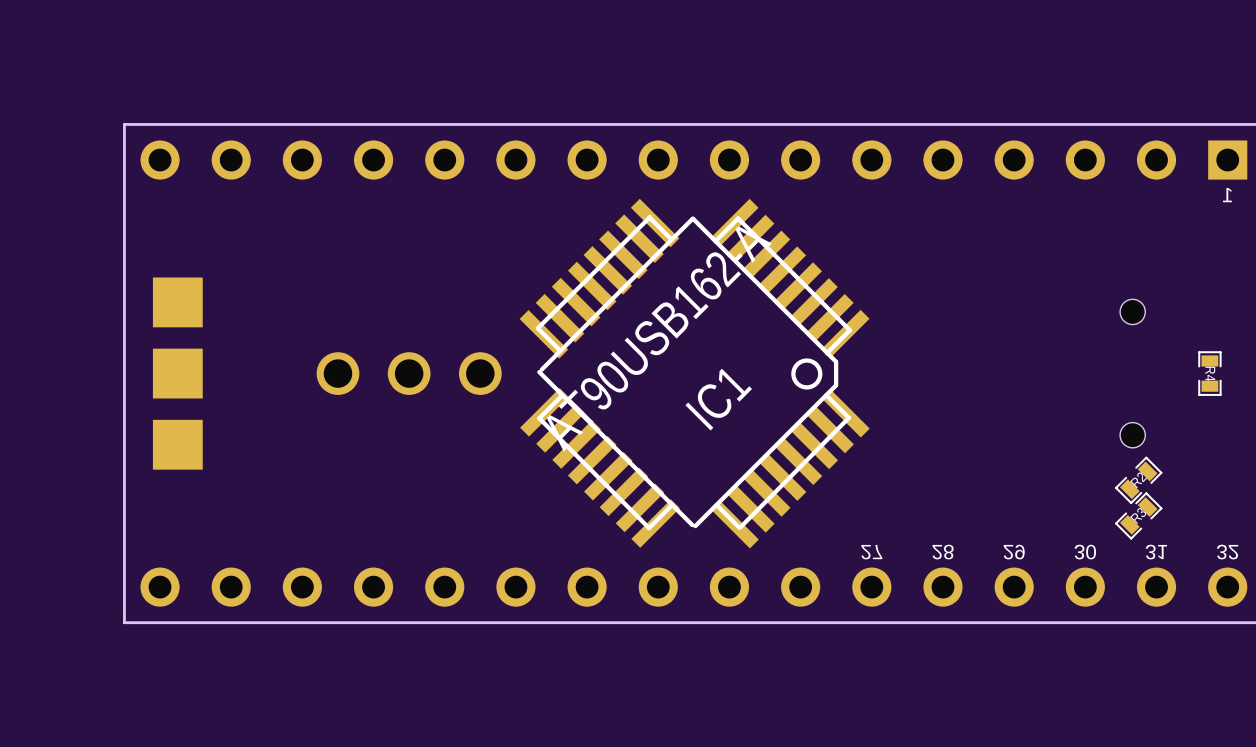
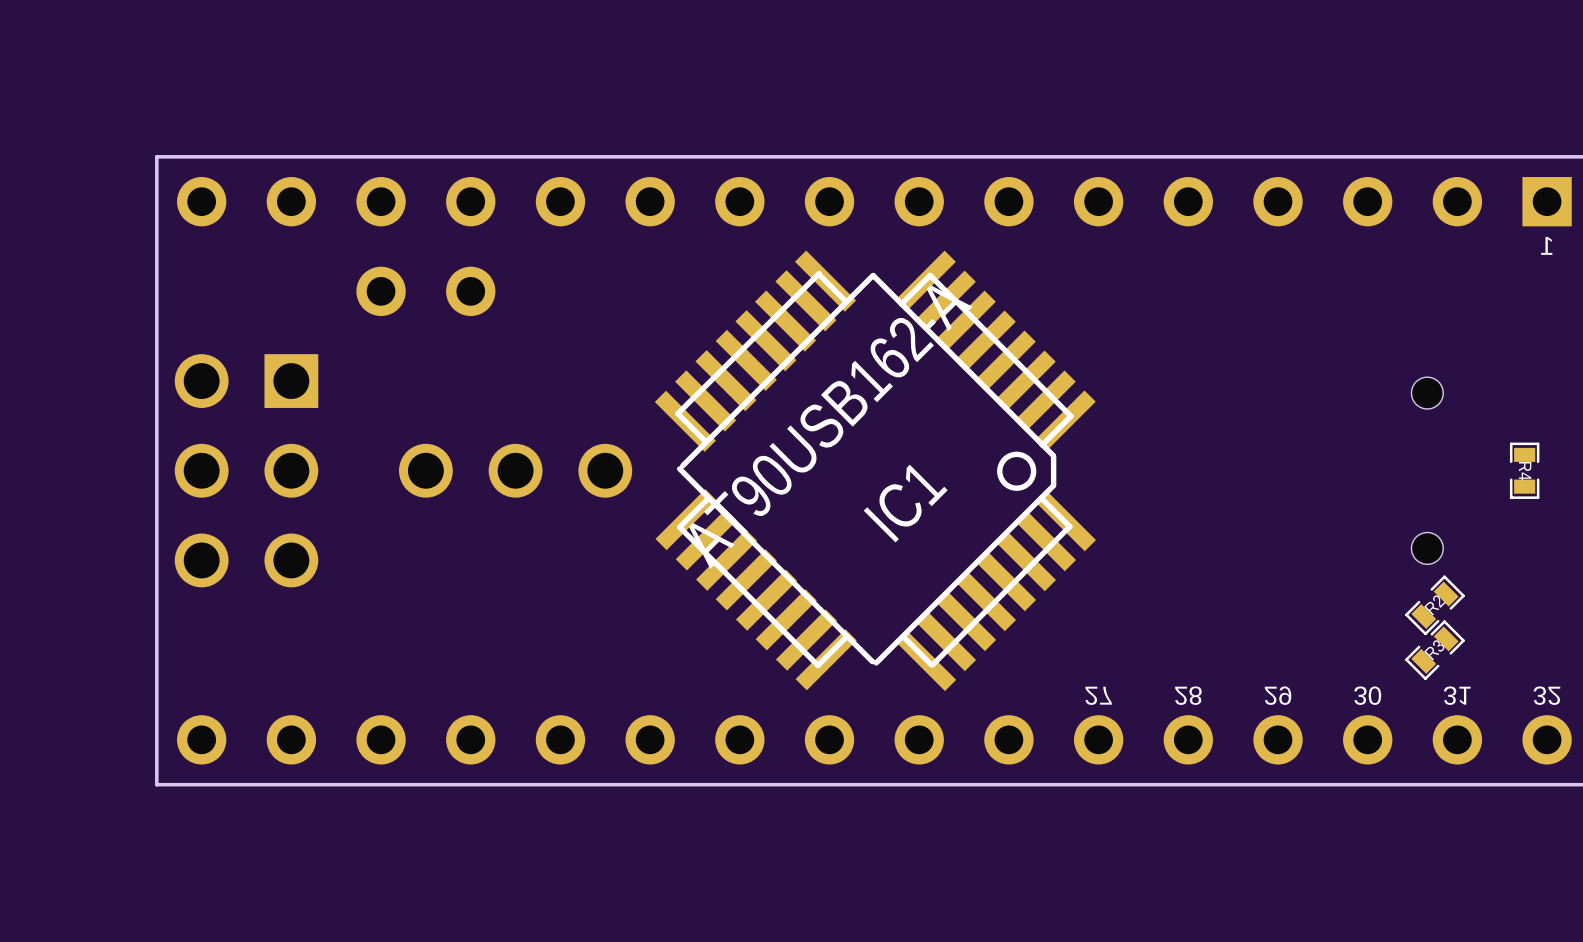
part: none -> (425, 291)
part footprint: [152, 277, 203, 470] -> [174, 354, 319, 588]

